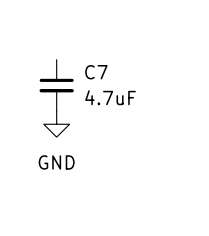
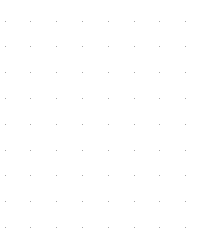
C7: 4.7uF (56, 85) -> none
power symbol: GND (56, 124) -> none

